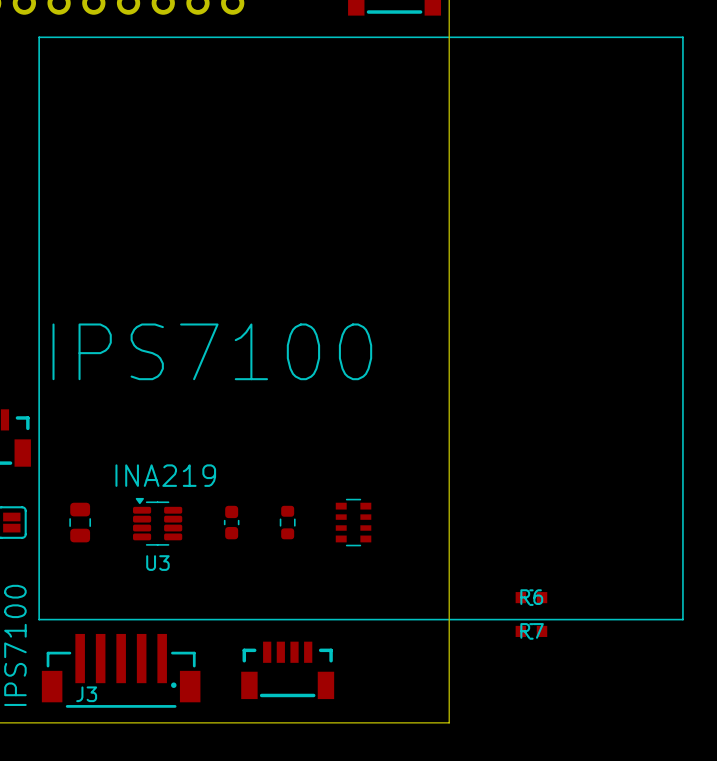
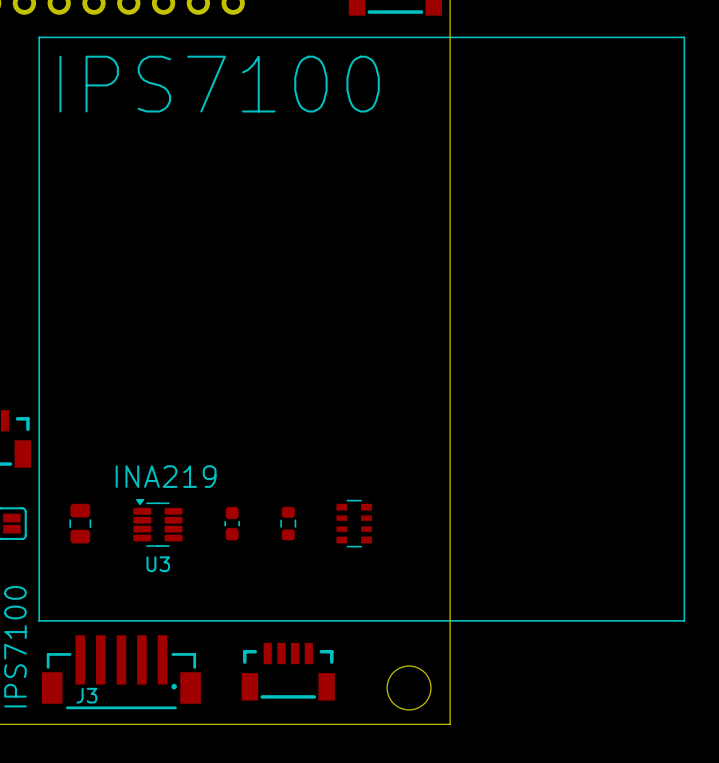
text position: IPS7100 (212, 351) -> IPS7100 (219, 84)
R6: (531, 597) -> none
R7: (531, 631) -> none
round board edge: none -> [386, 665, 432, 711]

